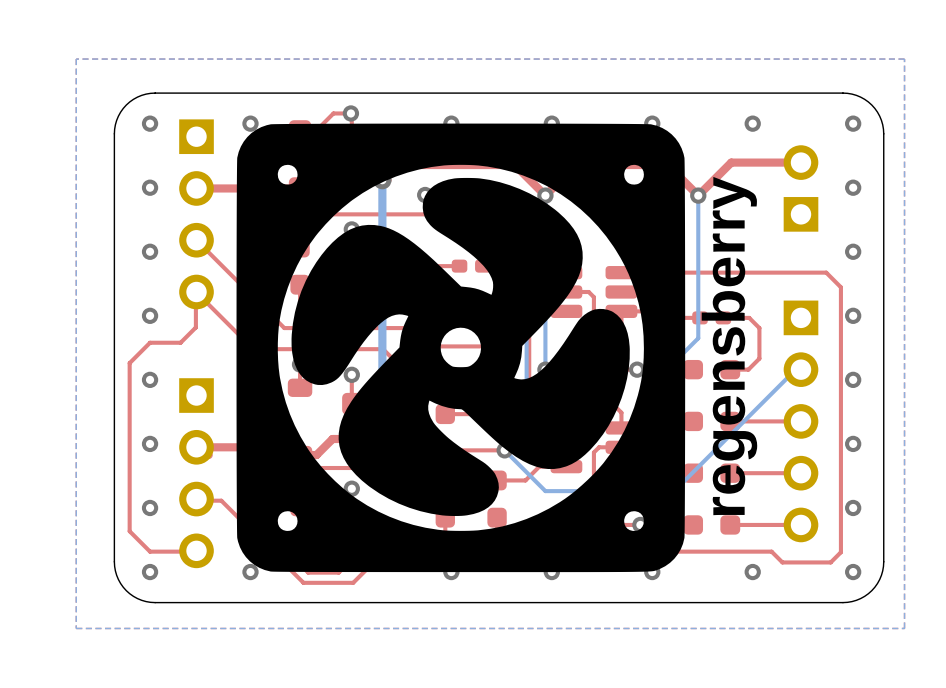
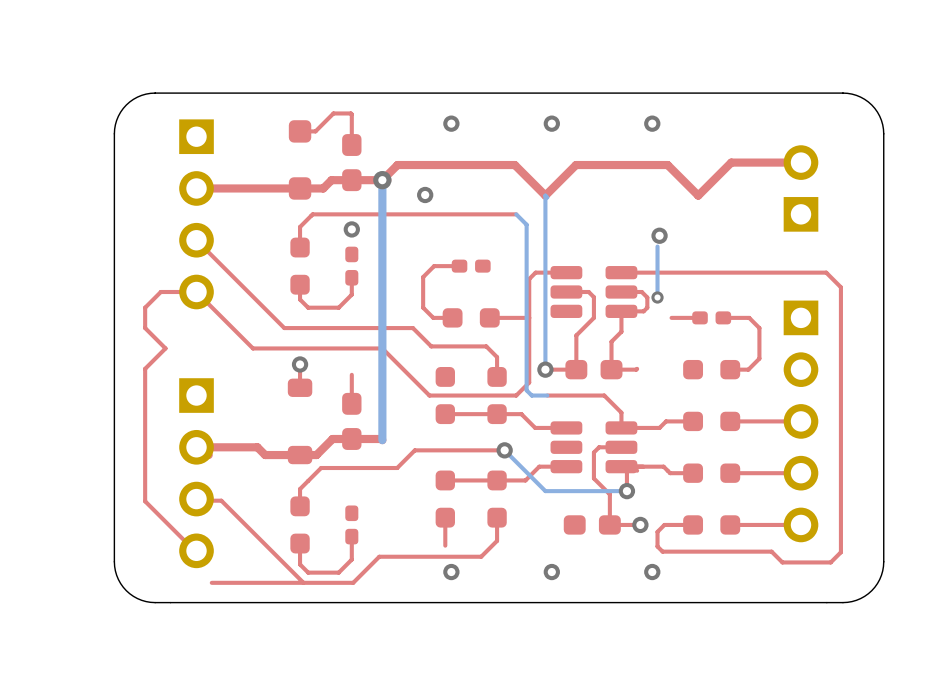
bottom zone outline: (904, 59) (904, 628) (76, 628) (76, 59) (904, 59) -> none
via: (350, 113) -> none
via: (150, 123) -> none
drawing: [236, 123, 686, 573] -> none
via: (250, 123) -> none
via: (752, 123) -> none
via: (853, 123) -> none
via: (150, 187) -> none
via: (853, 187) -> none
via: (545, 195) -> none
bottom track: (698, 195) (698, 338) (667, 368) -> none
via: (698, 195) -> none
bottom track: none -> (657, 246) (657, 297)
via: (150, 251) -> none
via: (853, 251) -> none
via: none -> (657, 297)
via: (150, 315) -> none
via: (853, 315) -> none
text: regensberry (729, 346) -> none
top track: (383, 349) (253, 349) (195, 291) (195, 327) (180, 342) (150, 342) (129, 363) (129, 531) (150, 551) (195, 551) -> (382, 348) (252, 348) (196, 292) (160, 292) (145, 307) (145, 328) (165, 348) (145, 368) (145, 501) (196, 552)
bottom track: (800, 368) (796, 368) (640, 524) -> none
via: (637, 369) -> none
via: (351, 374) -> none
via: (150, 379) -> none
via: (853, 379) -> none
via: (150, 443) -> none
via: (853, 443) -> none
via: (351, 488) -> none
via: (150, 507) -> none
via: (853, 507) -> none
via: (150, 572) -> none
via: (250, 572) -> none
via: (752, 572) -> none
via: (853, 572) -> none
top track: none -> (303, 582) (211, 582)

